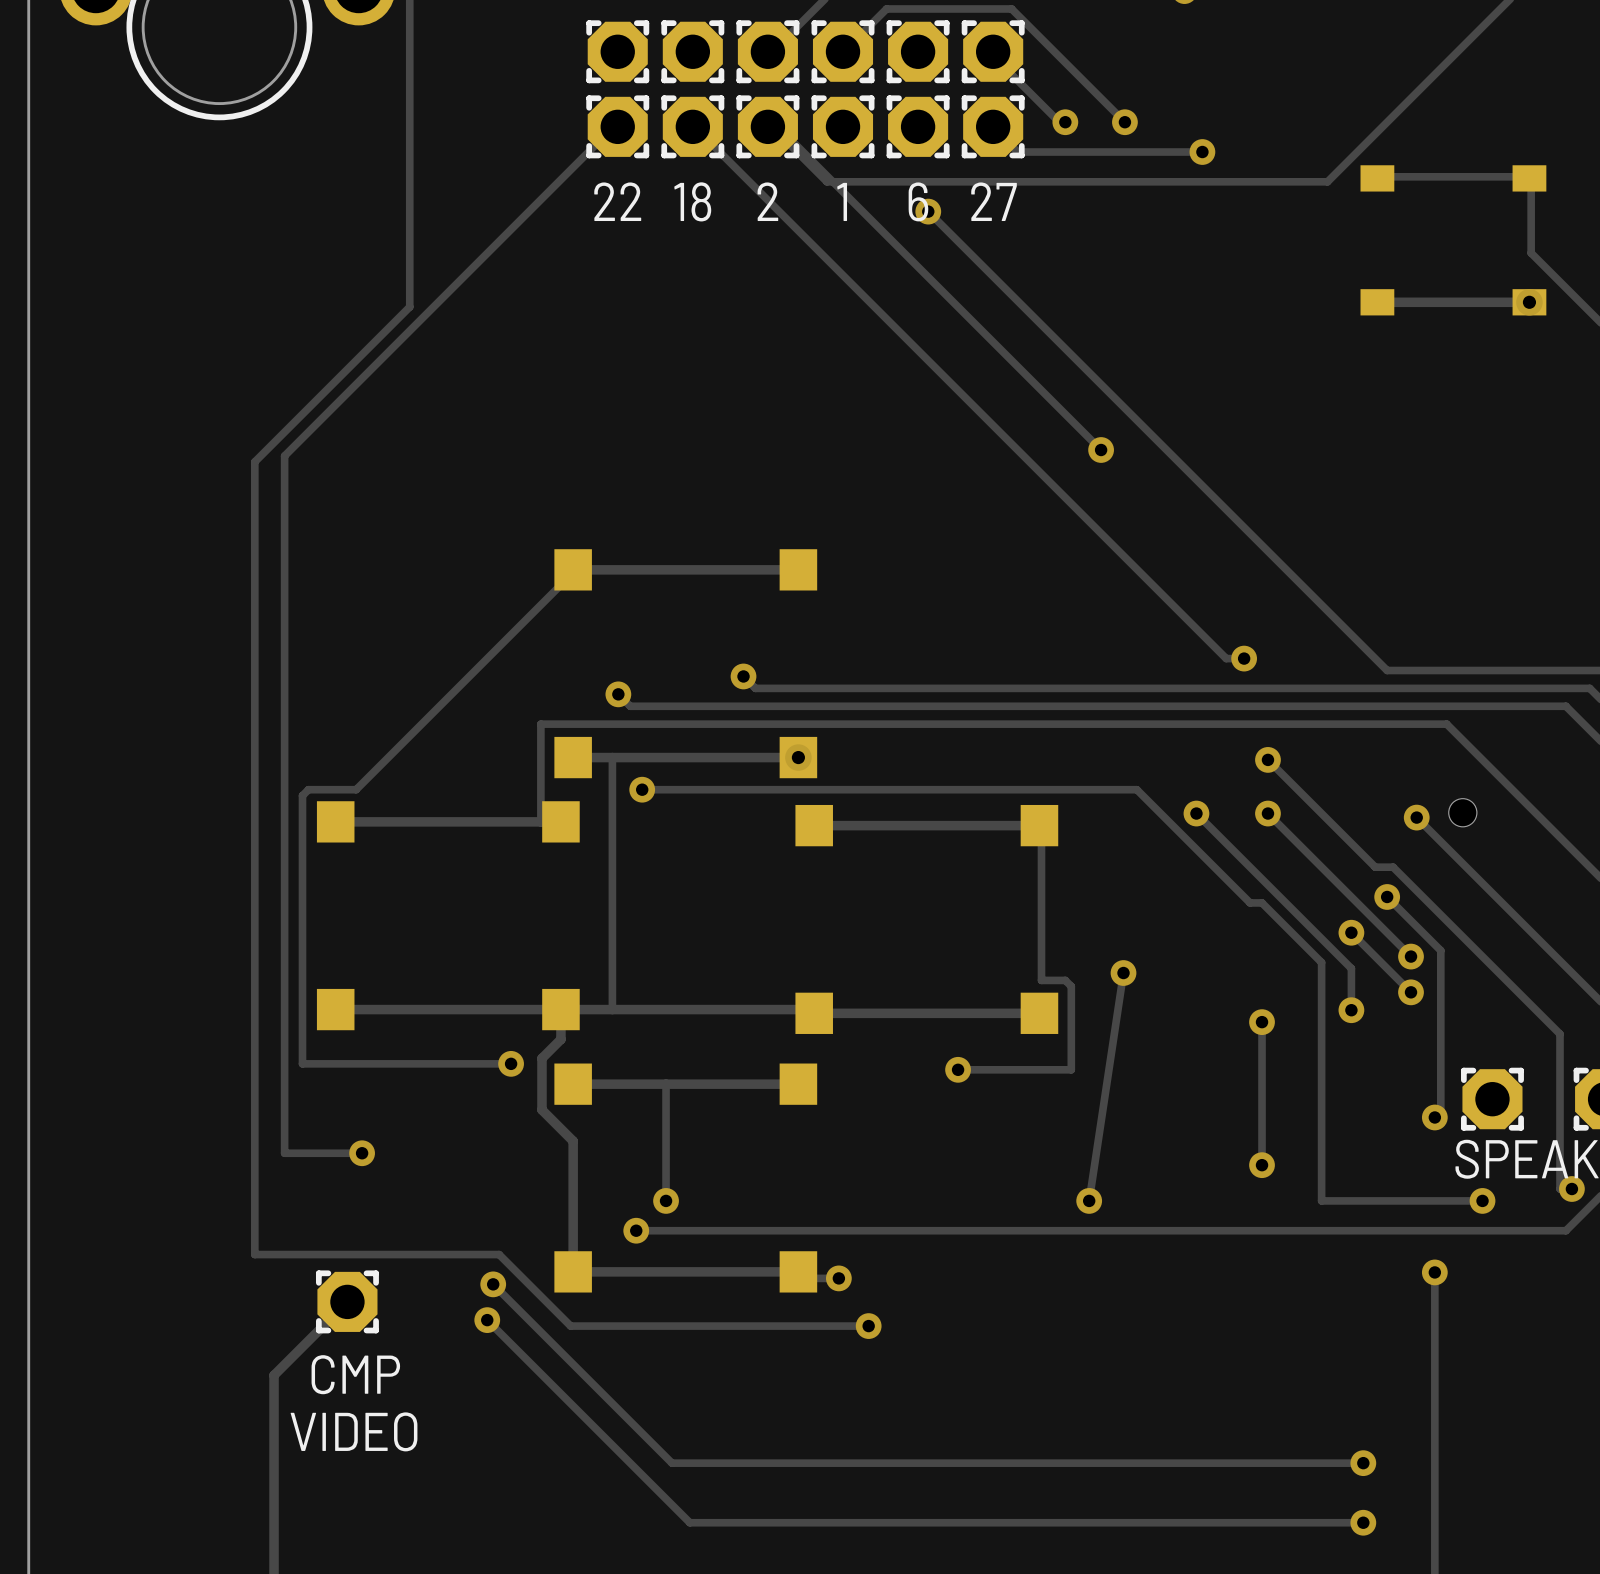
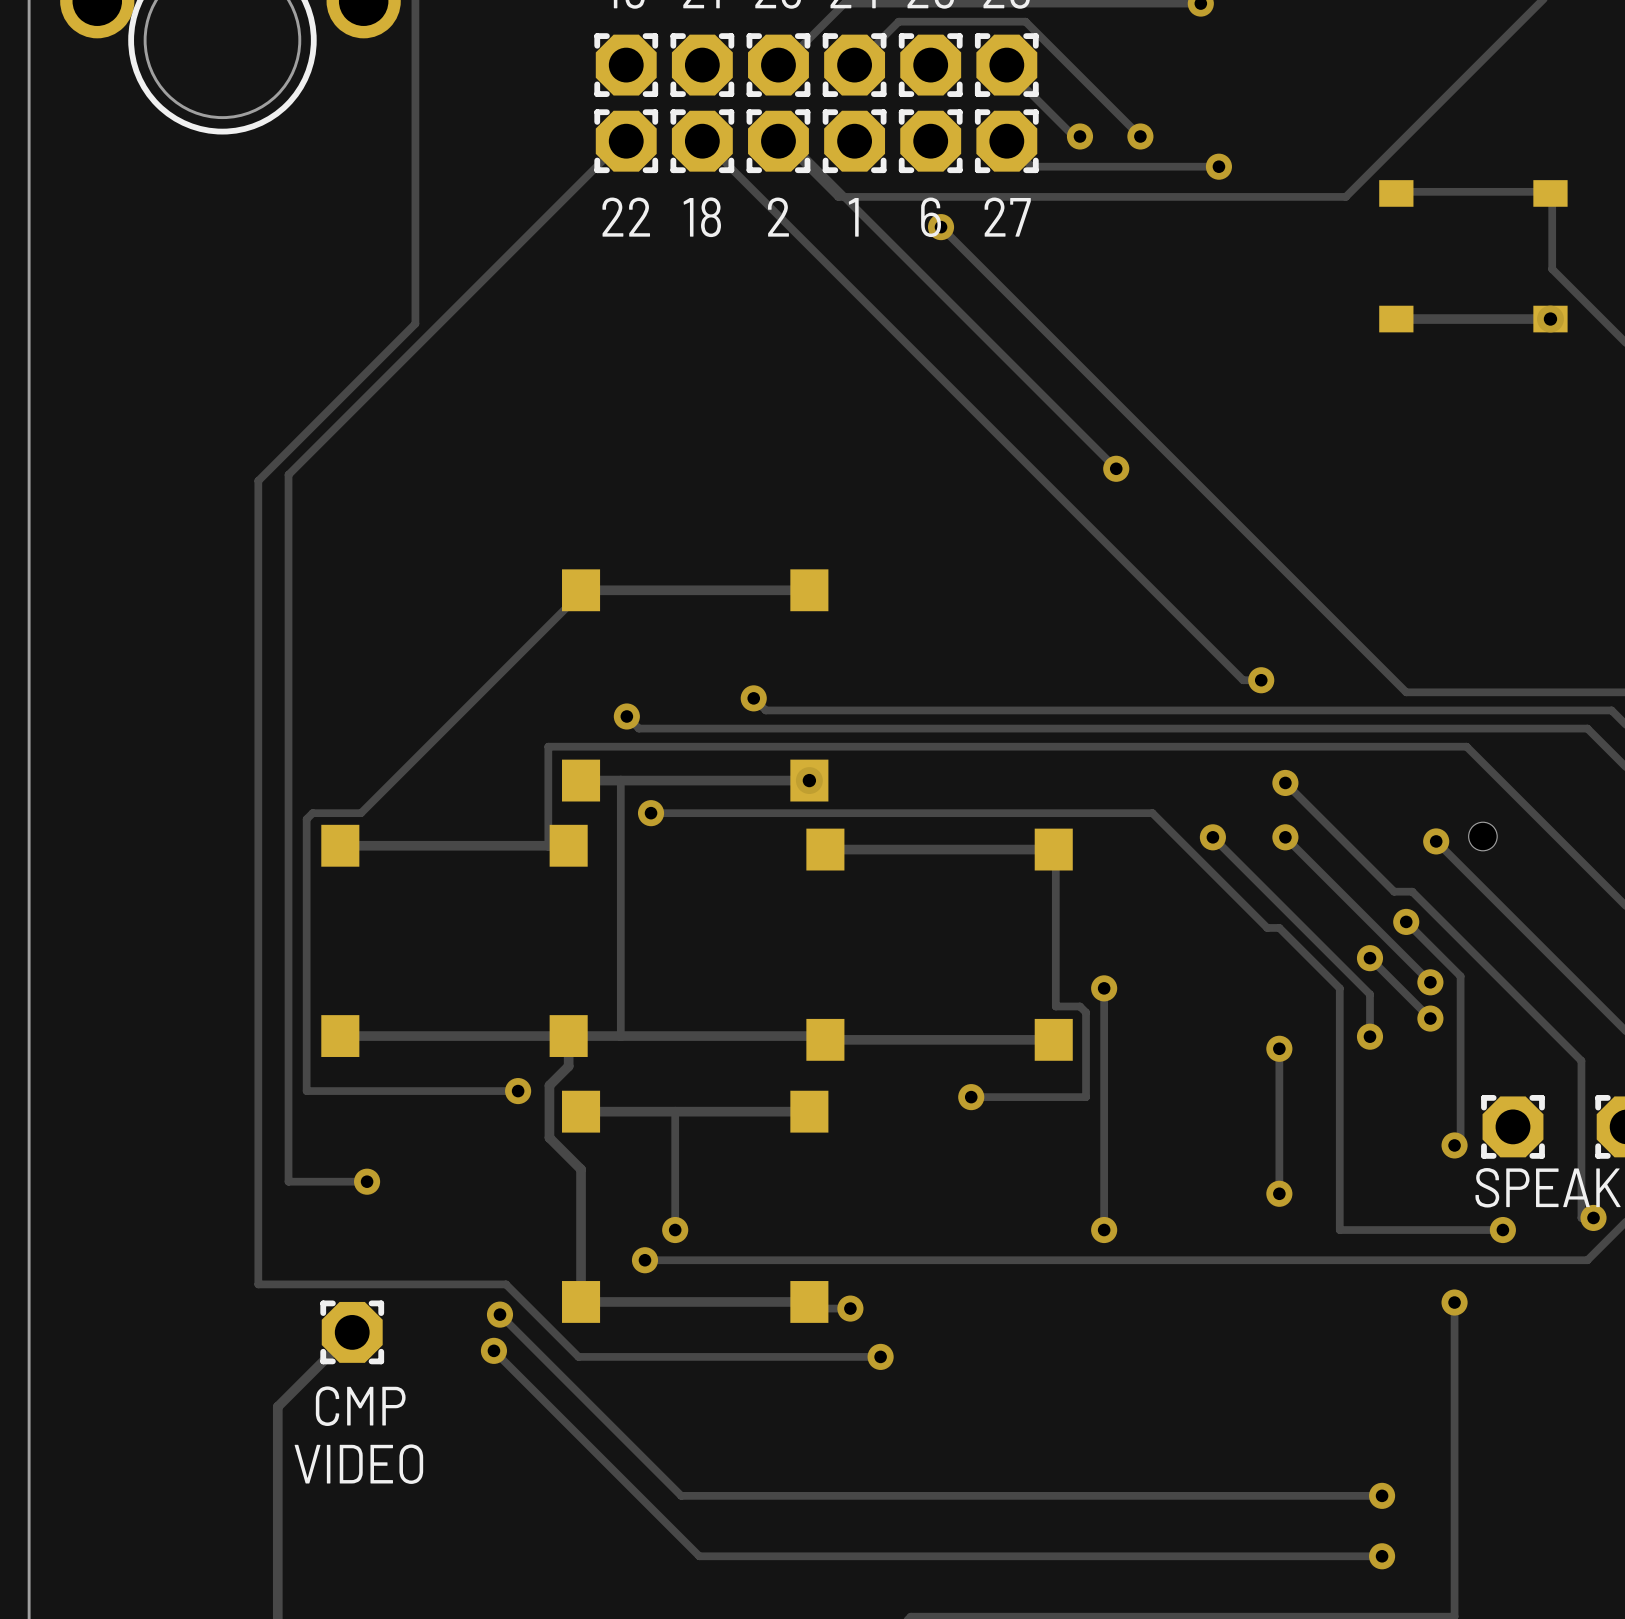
track: (1123, 973) (1089, 1200) -> (1104, 988) (1104, 1230)
via position: (1123, 973) -> (1104, 988)

